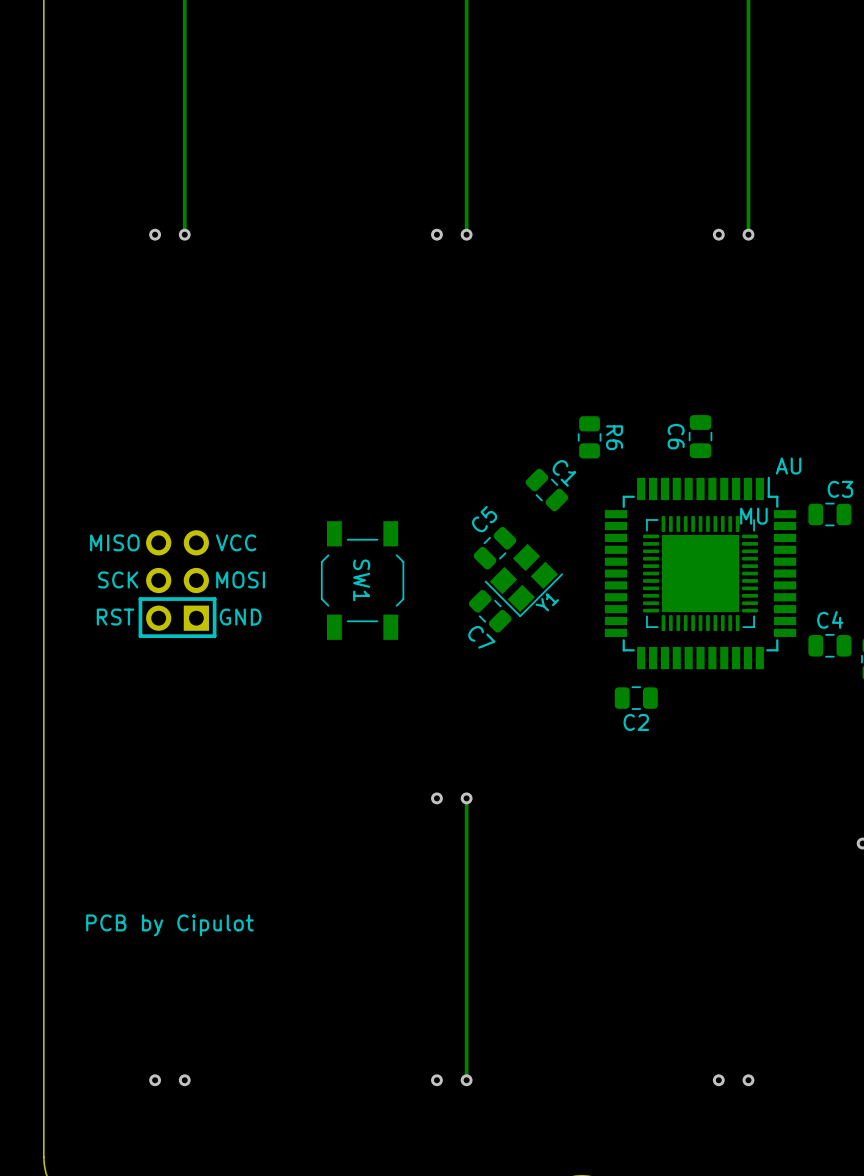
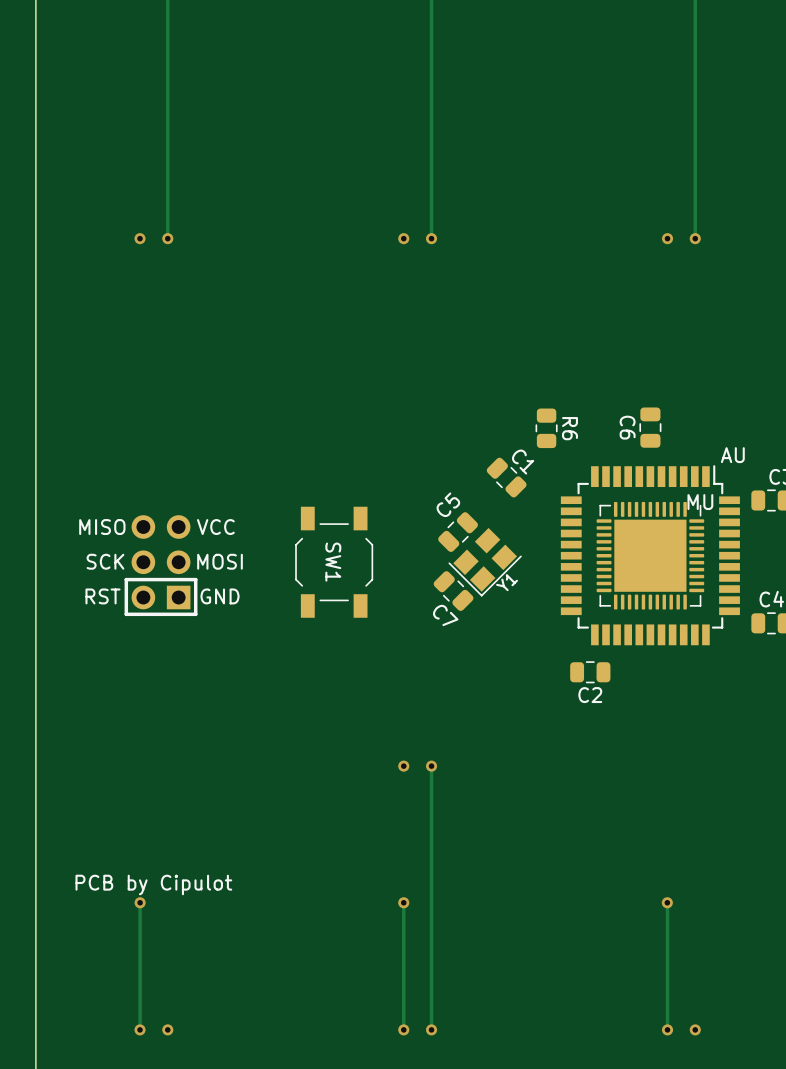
track: none -> (140, 902) (140, 1029)
via: none -> (140, 902)
track: none -> (403, 902) (403, 1029)
via: none -> (403, 902)
track: none -> (667, 902) (667, 1029)
via: none -> (667, 902)

